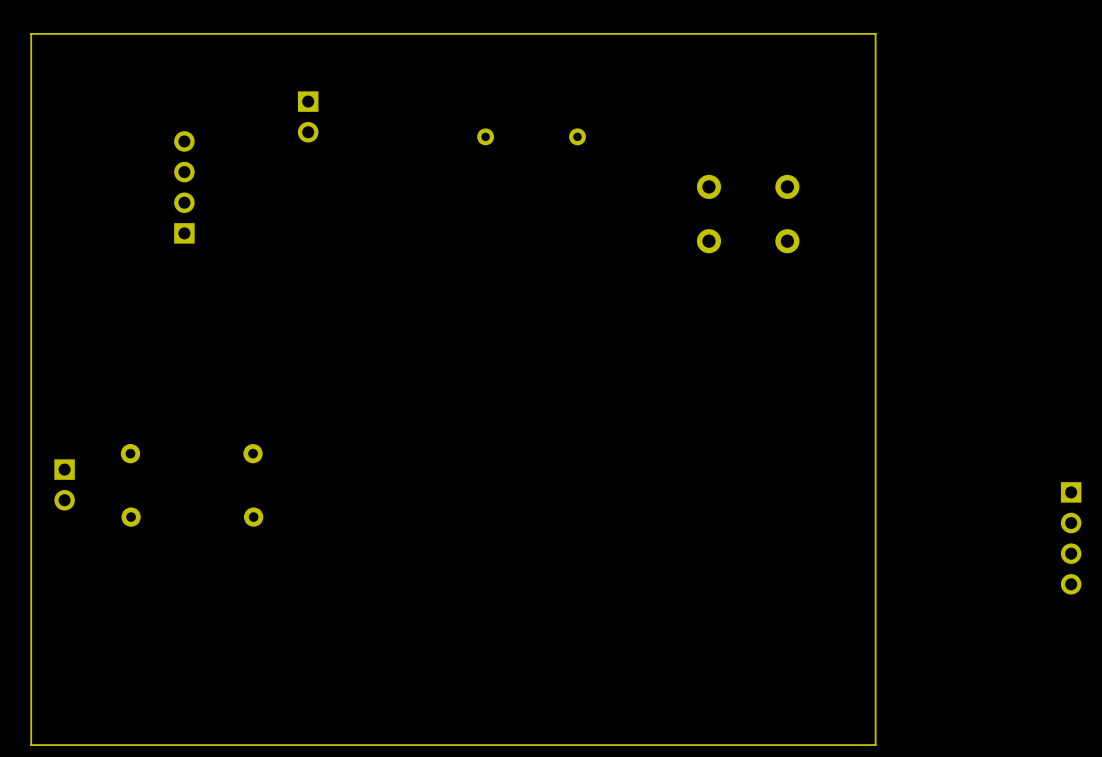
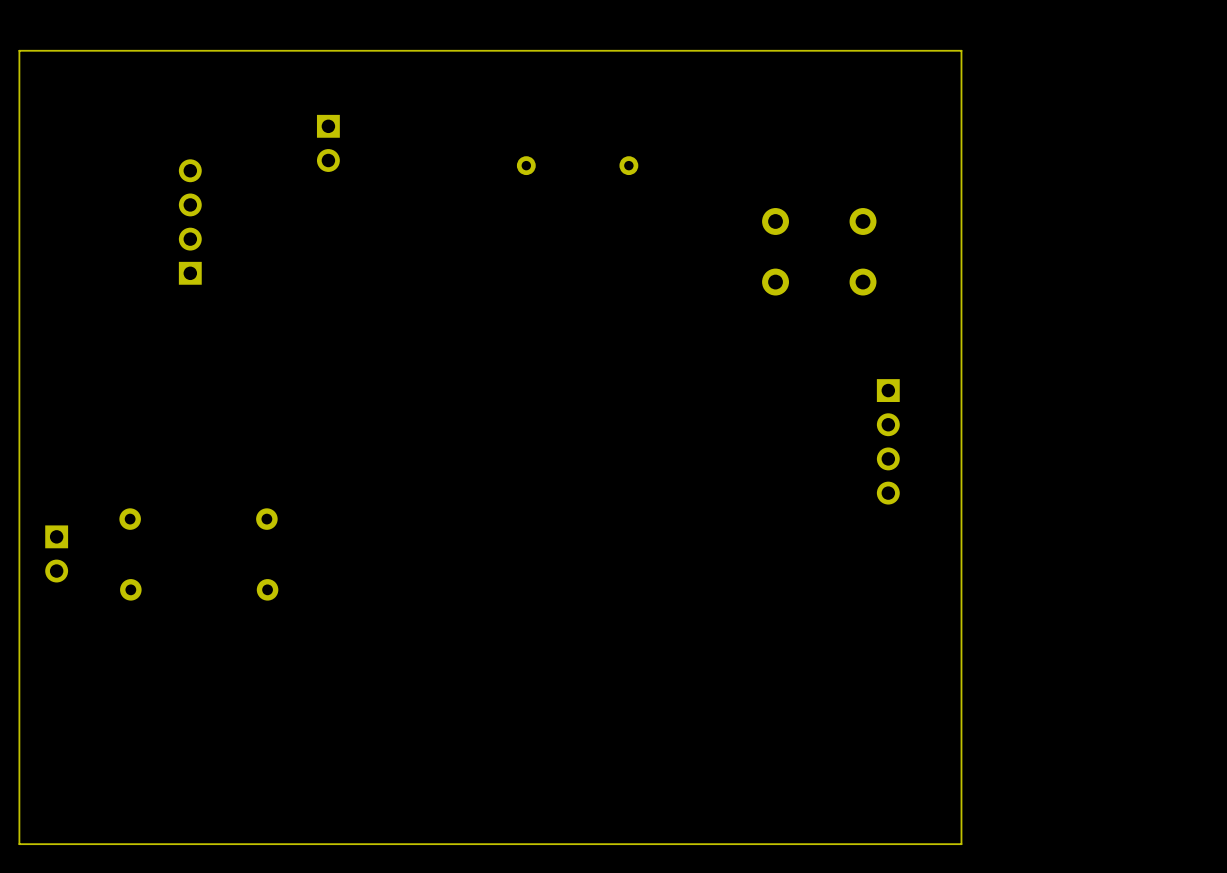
part: none -> (888, 441)
part: (1071, 538) -> none

